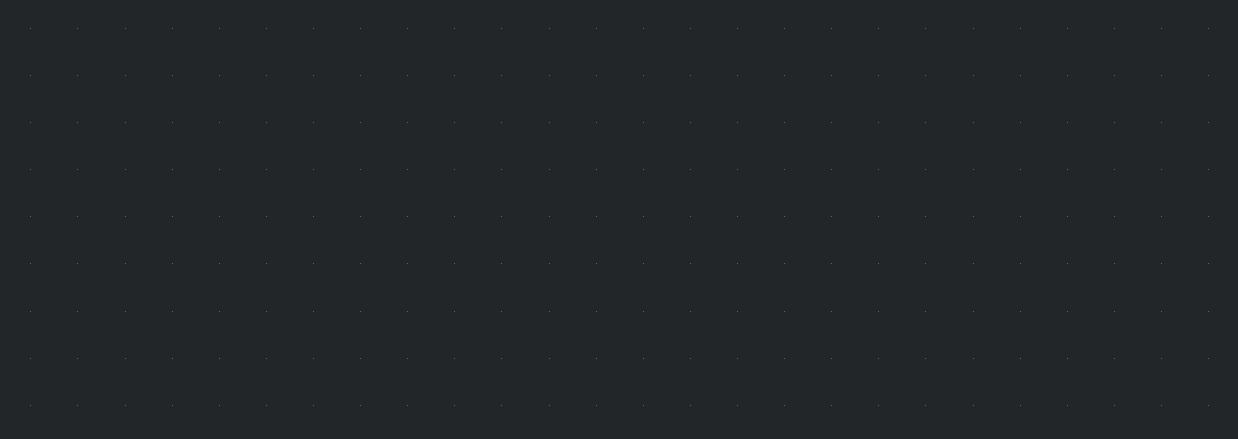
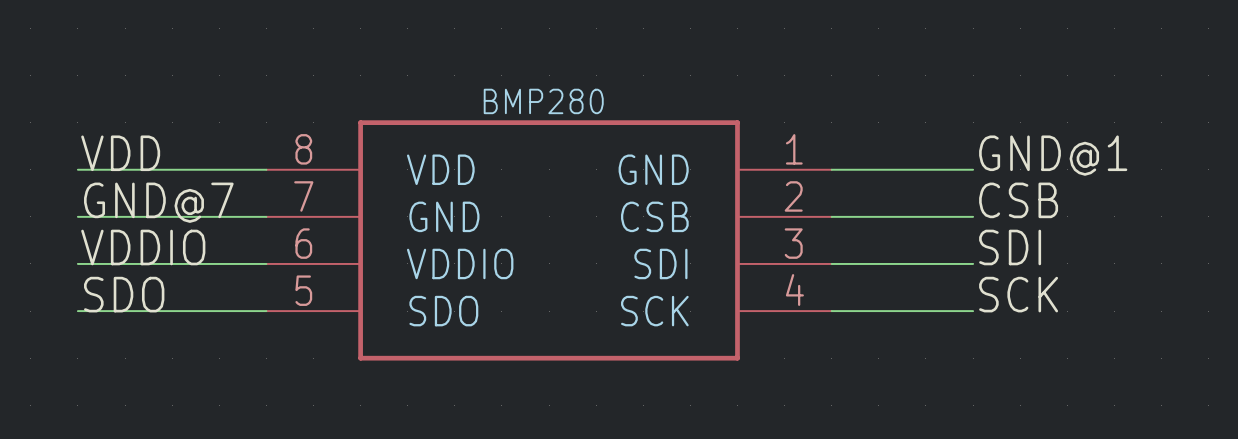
label: none -> VDD (120, 153)
label: none -> GND@1 (1053, 155)
wire: none -> (77, 169) (266, 169)
wire: none -> (831, 169) (973, 169)
label: none -> CSB (1018, 200)
label: none -> GND@7 (158, 202)
wire: none -> (77, 216) (266, 216)
wire: none -> (831, 216) (973, 216)
BMP280: none -> (549, 240)
label: none -> VDDIO (143, 247)
label: none -> SDI (1010, 247)
wire: none -> (77, 263) (266, 263)
wire: none -> (831, 263) (973, 263)
label: none -> SDO (124, 294)
label: none -> SCK (1018, 294)
wire: none -> (77, 311) (266, 311)
wire: none -> (831, 311) (973, 311)

